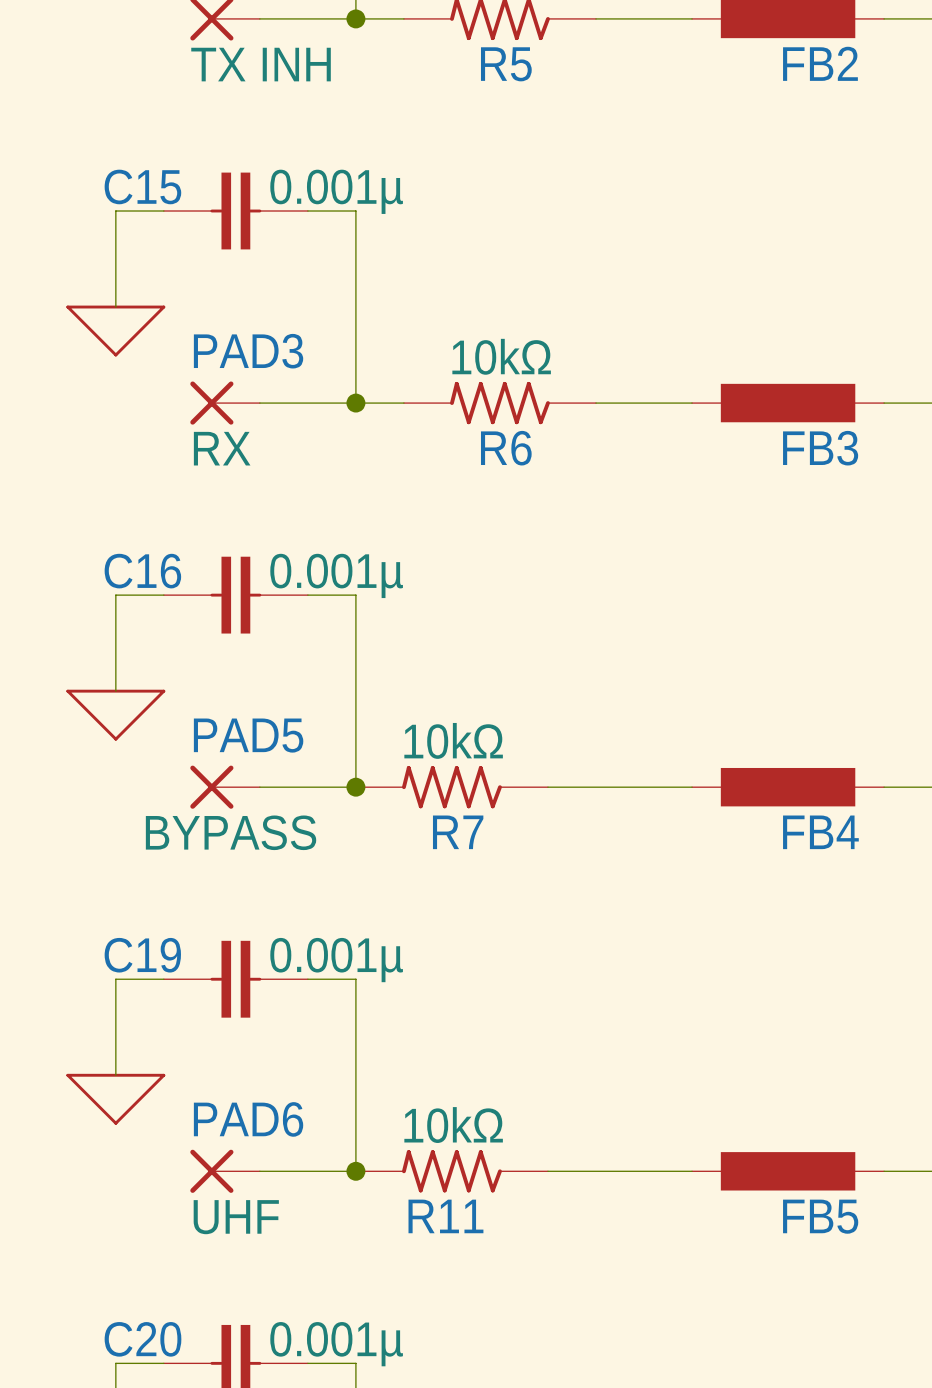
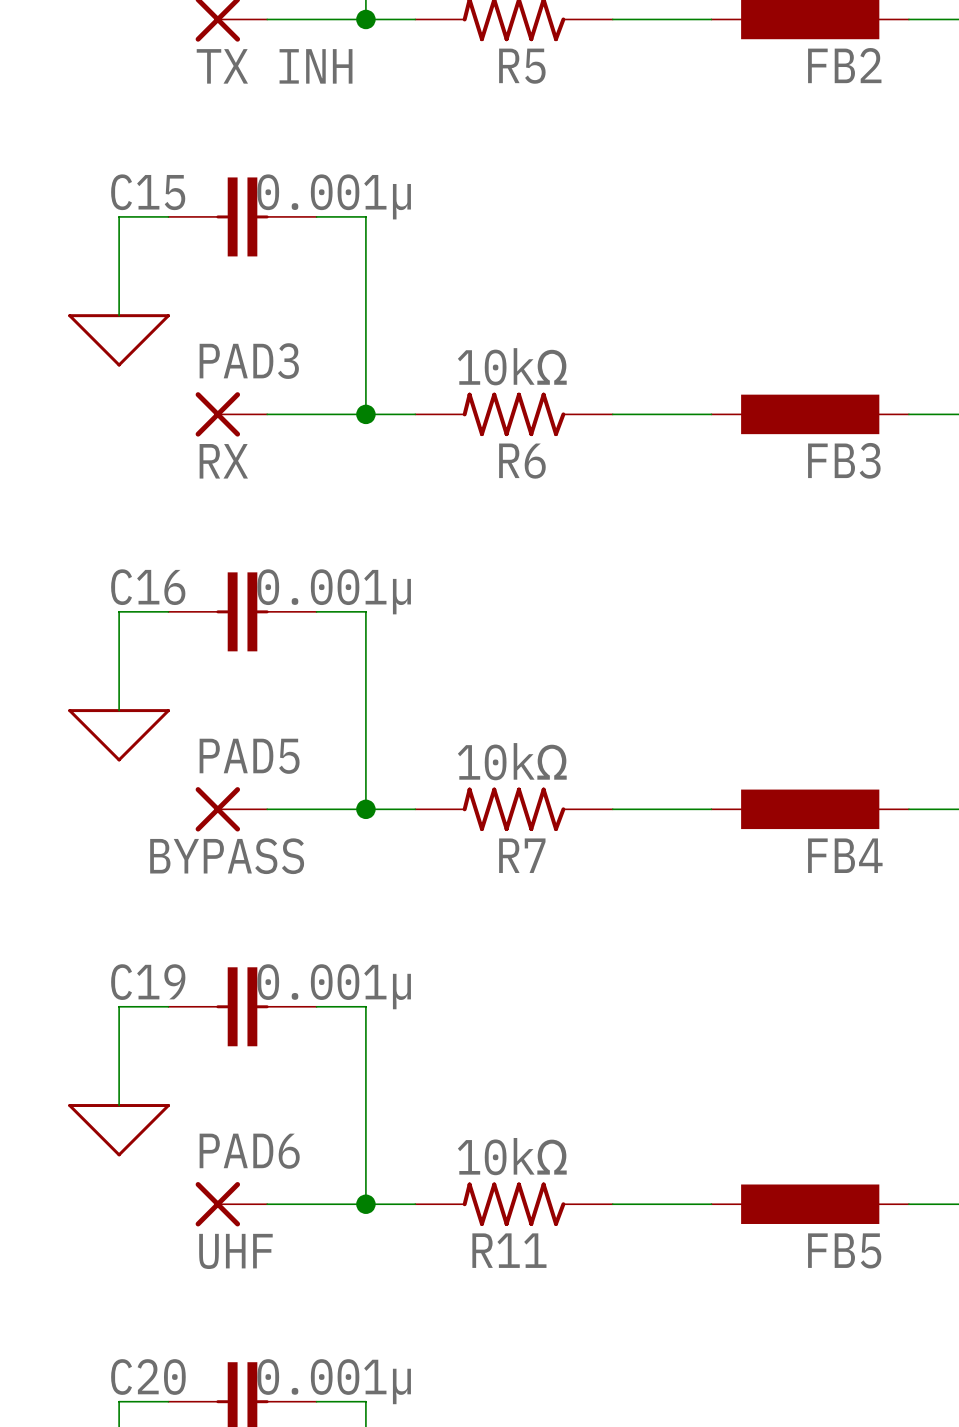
R7 position: (451, 787) -> (514, 809)
R11 position: (451, 1171) -> (514, 1204)

